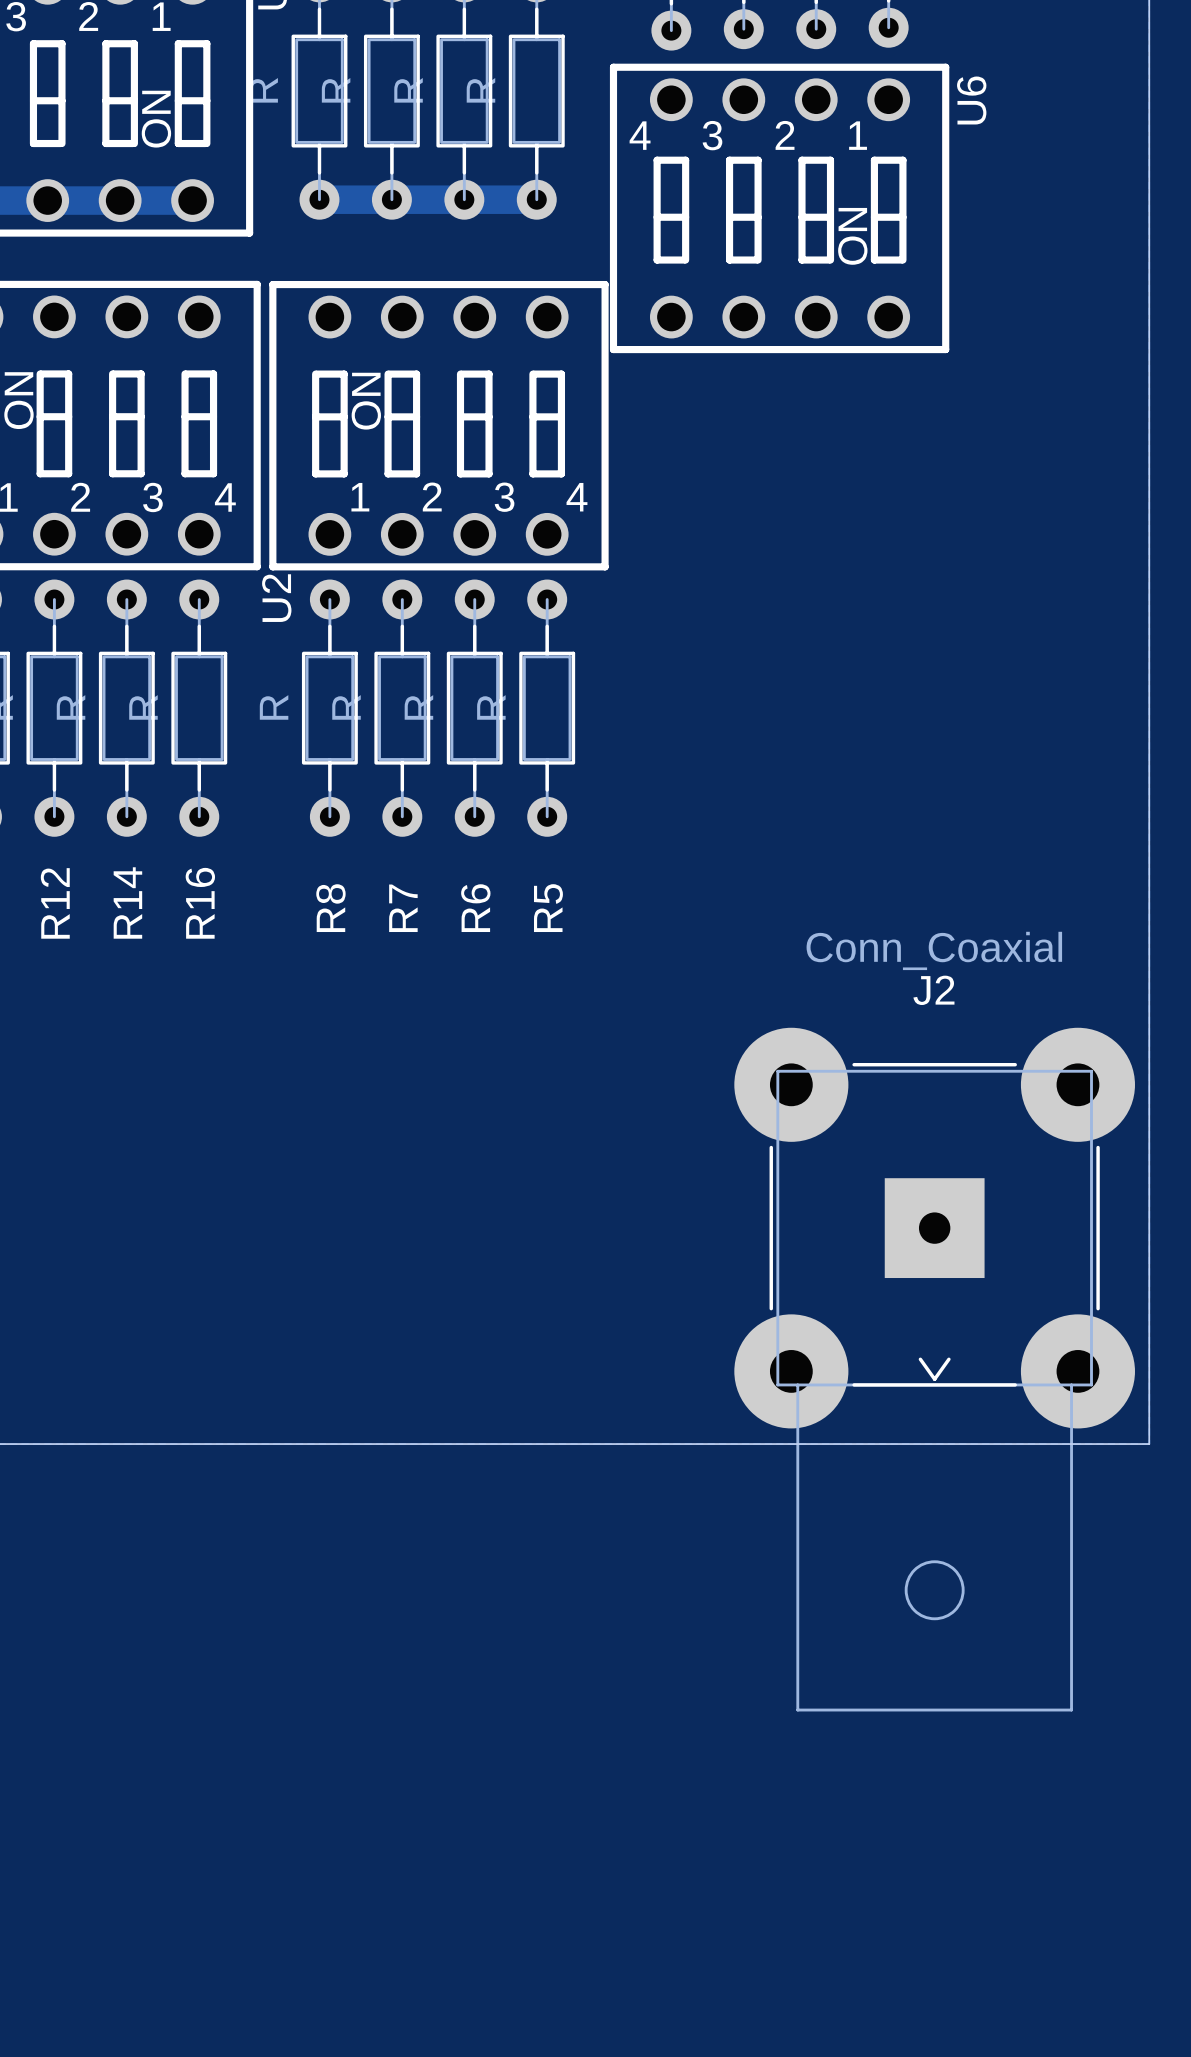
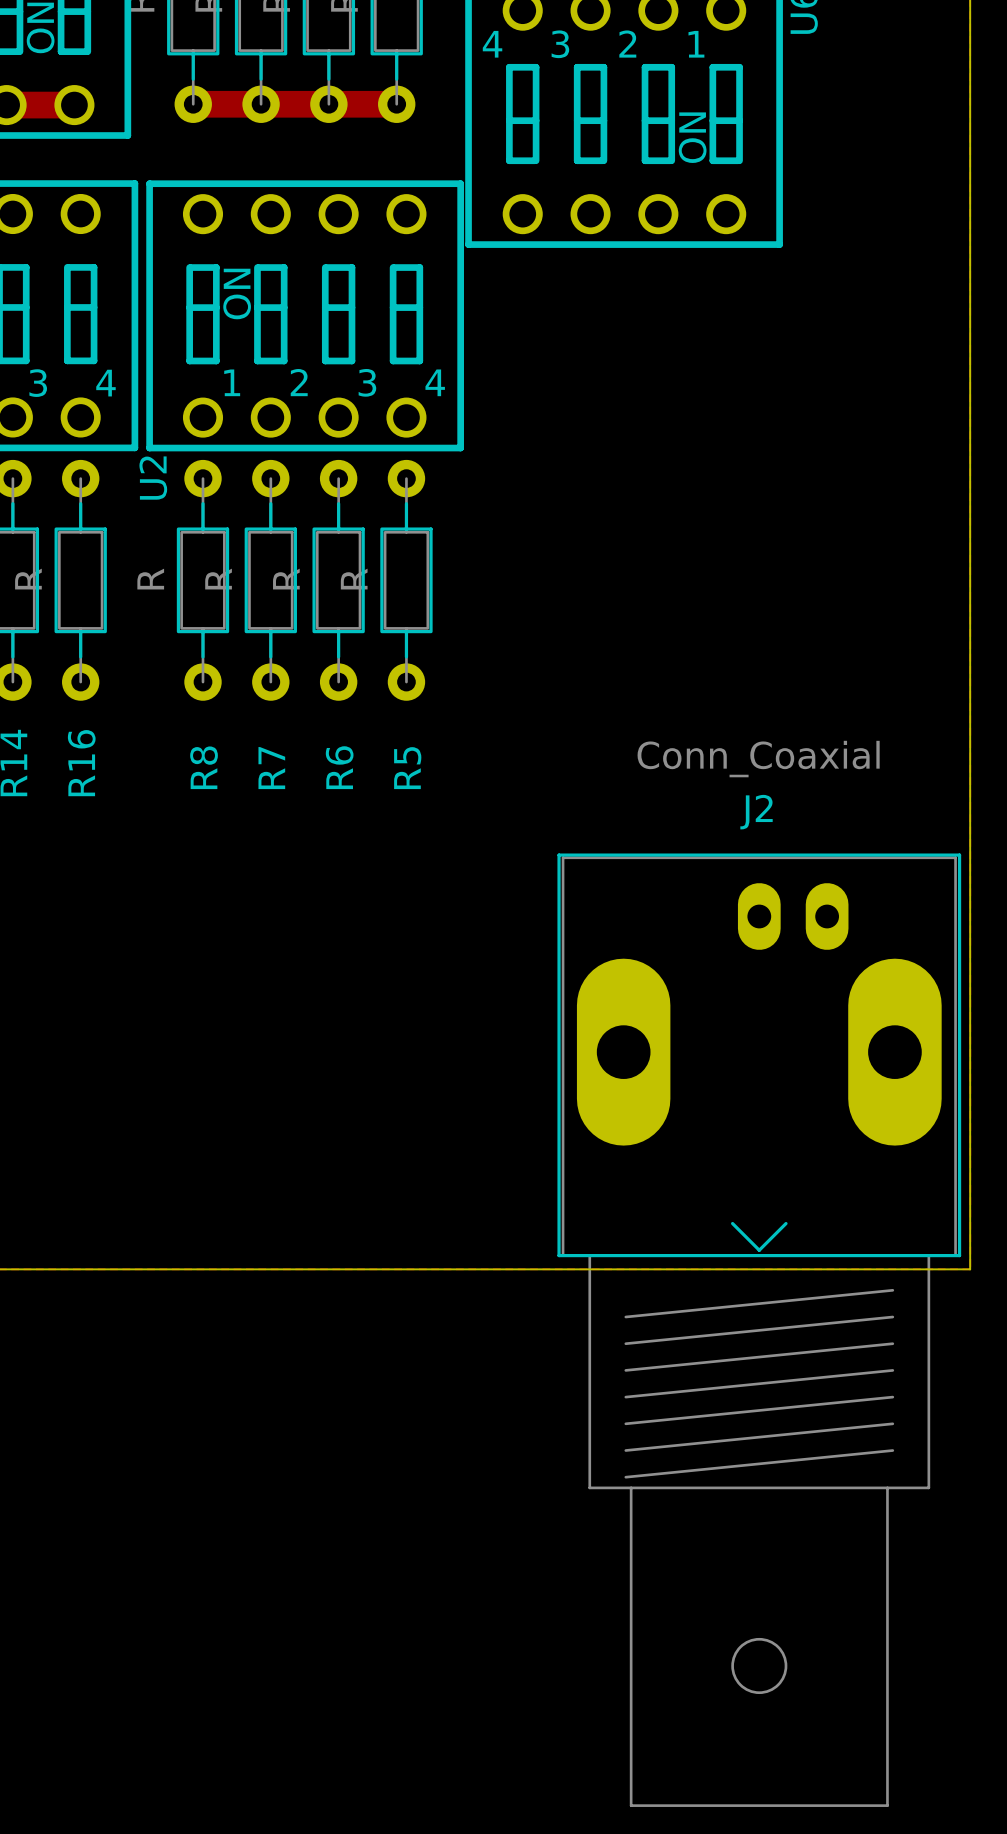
J2 value position: Conn_Coaxial (934, 950) -> Conn_Coaxial (758, 759)
J2 name position: J2 (933, 990) -> J2 (756, 812)
J2 footprint: [734, 1027, 1135, 1712] -> [557, 853, 962, 1807]

